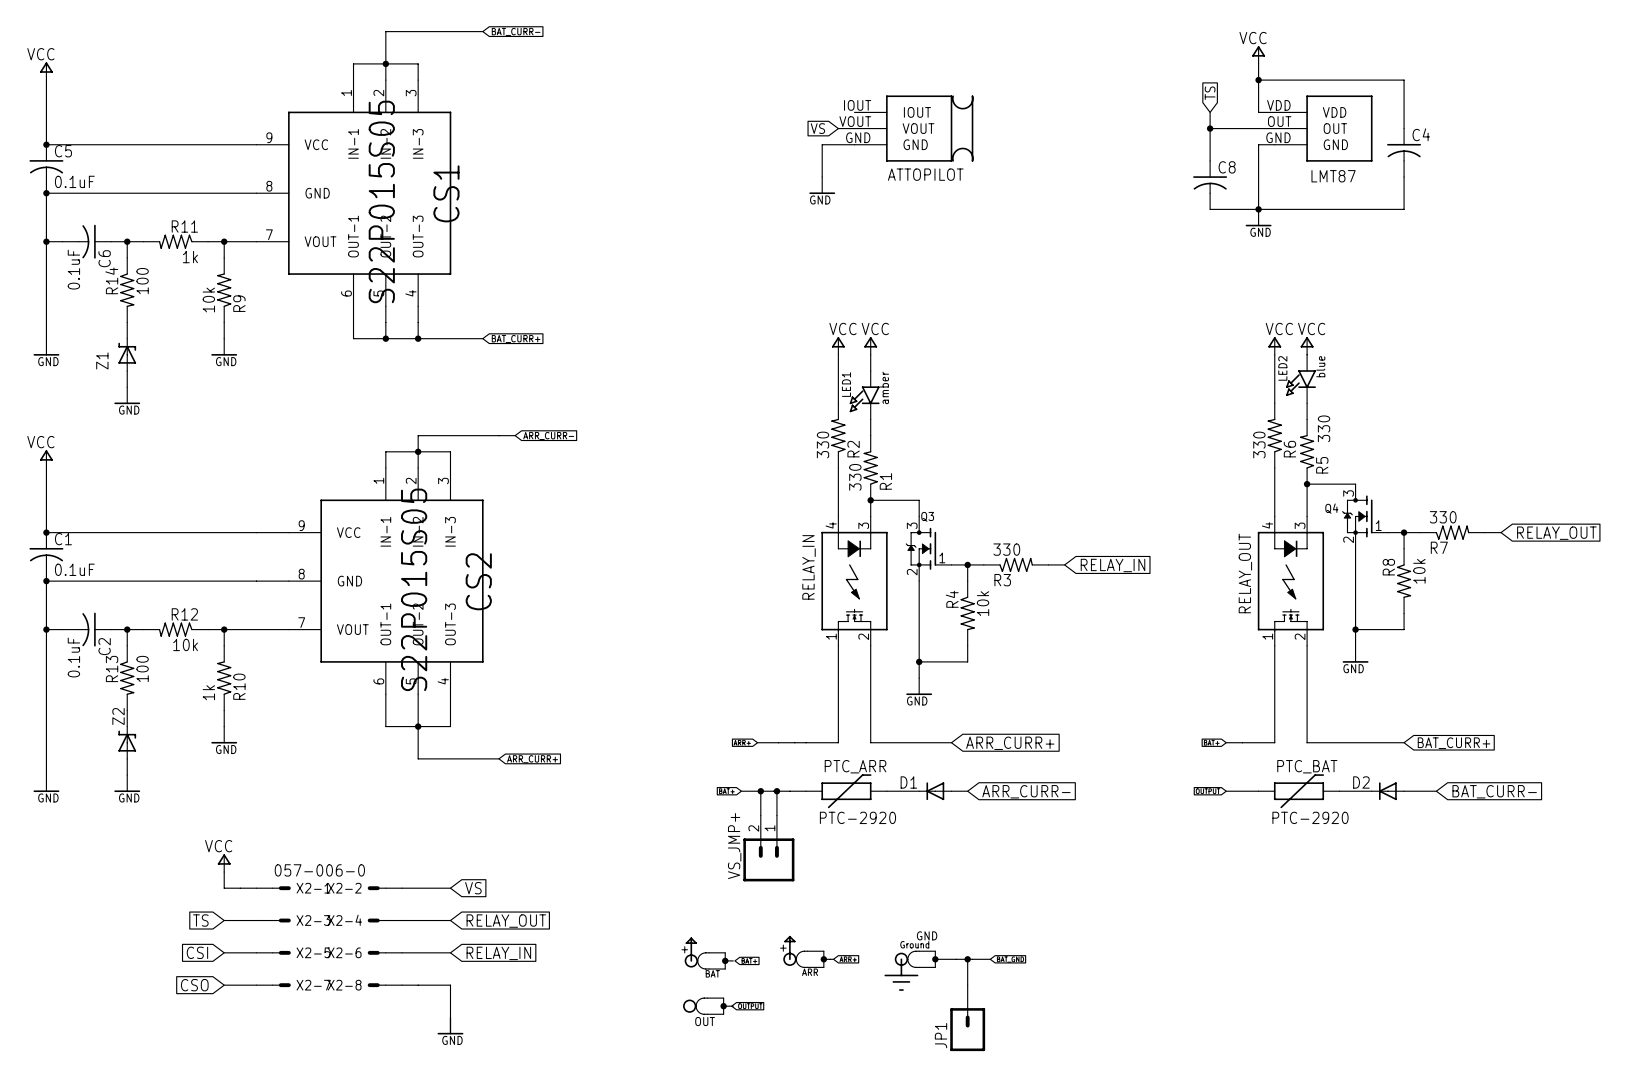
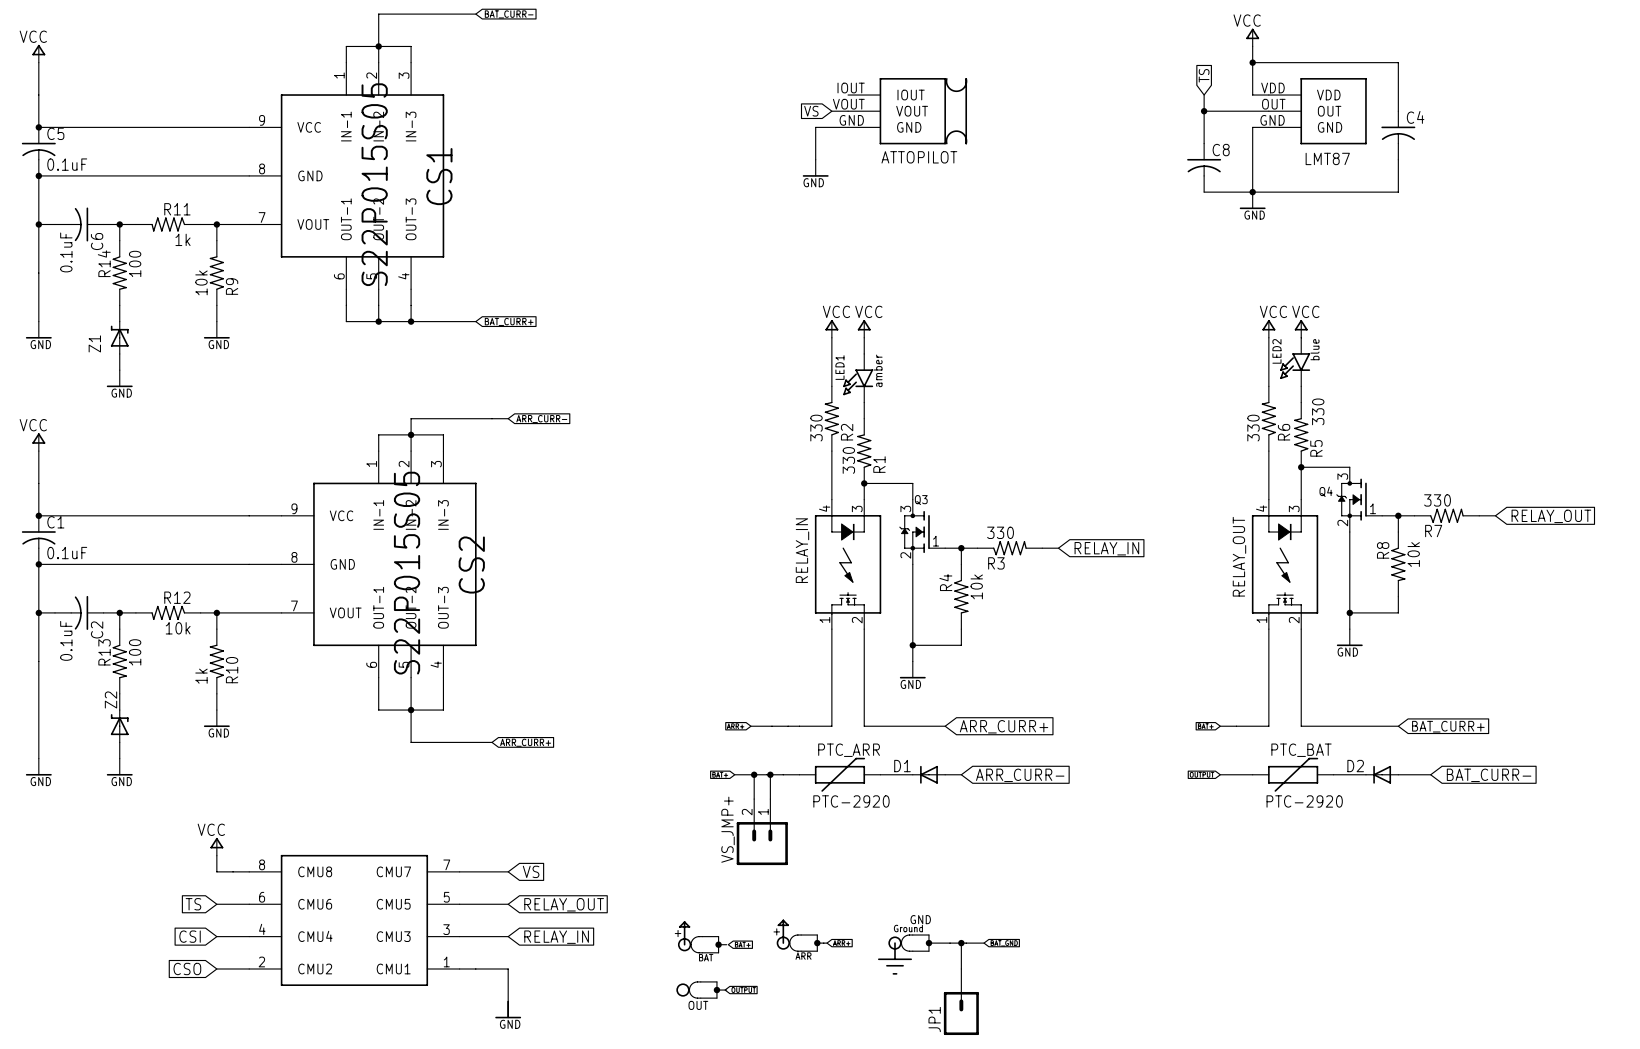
X2-1: 057-006-0 (273, 888) -> none
X2-2: (384, 888) -> none
wire: (402, 888) (450, 888) -> (459, 871) (508, 871)
global label position: VS (473, 888) -> VS (531, 871)
X2-3: (273, 920) -> none
X2-4: (384, 920) -> none
wire: (402, 920) (450, 920) -> (459, 904) (508, 904)
global label position: RELAY_OUT (506, 921) -> RELAY_OUT (564, 904)
part: none -> (354, 920)
X2-5: (273, 952) -> none
X2-6: (384, 952) -> none
wire: (402, 952) (450, 952) -> (459, 936) (508, 936)
global label position: RELAY_IN (498, 953) -> RELAY_IN (556, 937)
X2-7: (273, 985) -> none
X2-8: (384, 985) -> none
wire: (402, 985) (450, 985) (450, 1033) -> (459, 968) (508, 968) (508, 1017)
power symbol position: (450, 1025) -> (508, 1009)

